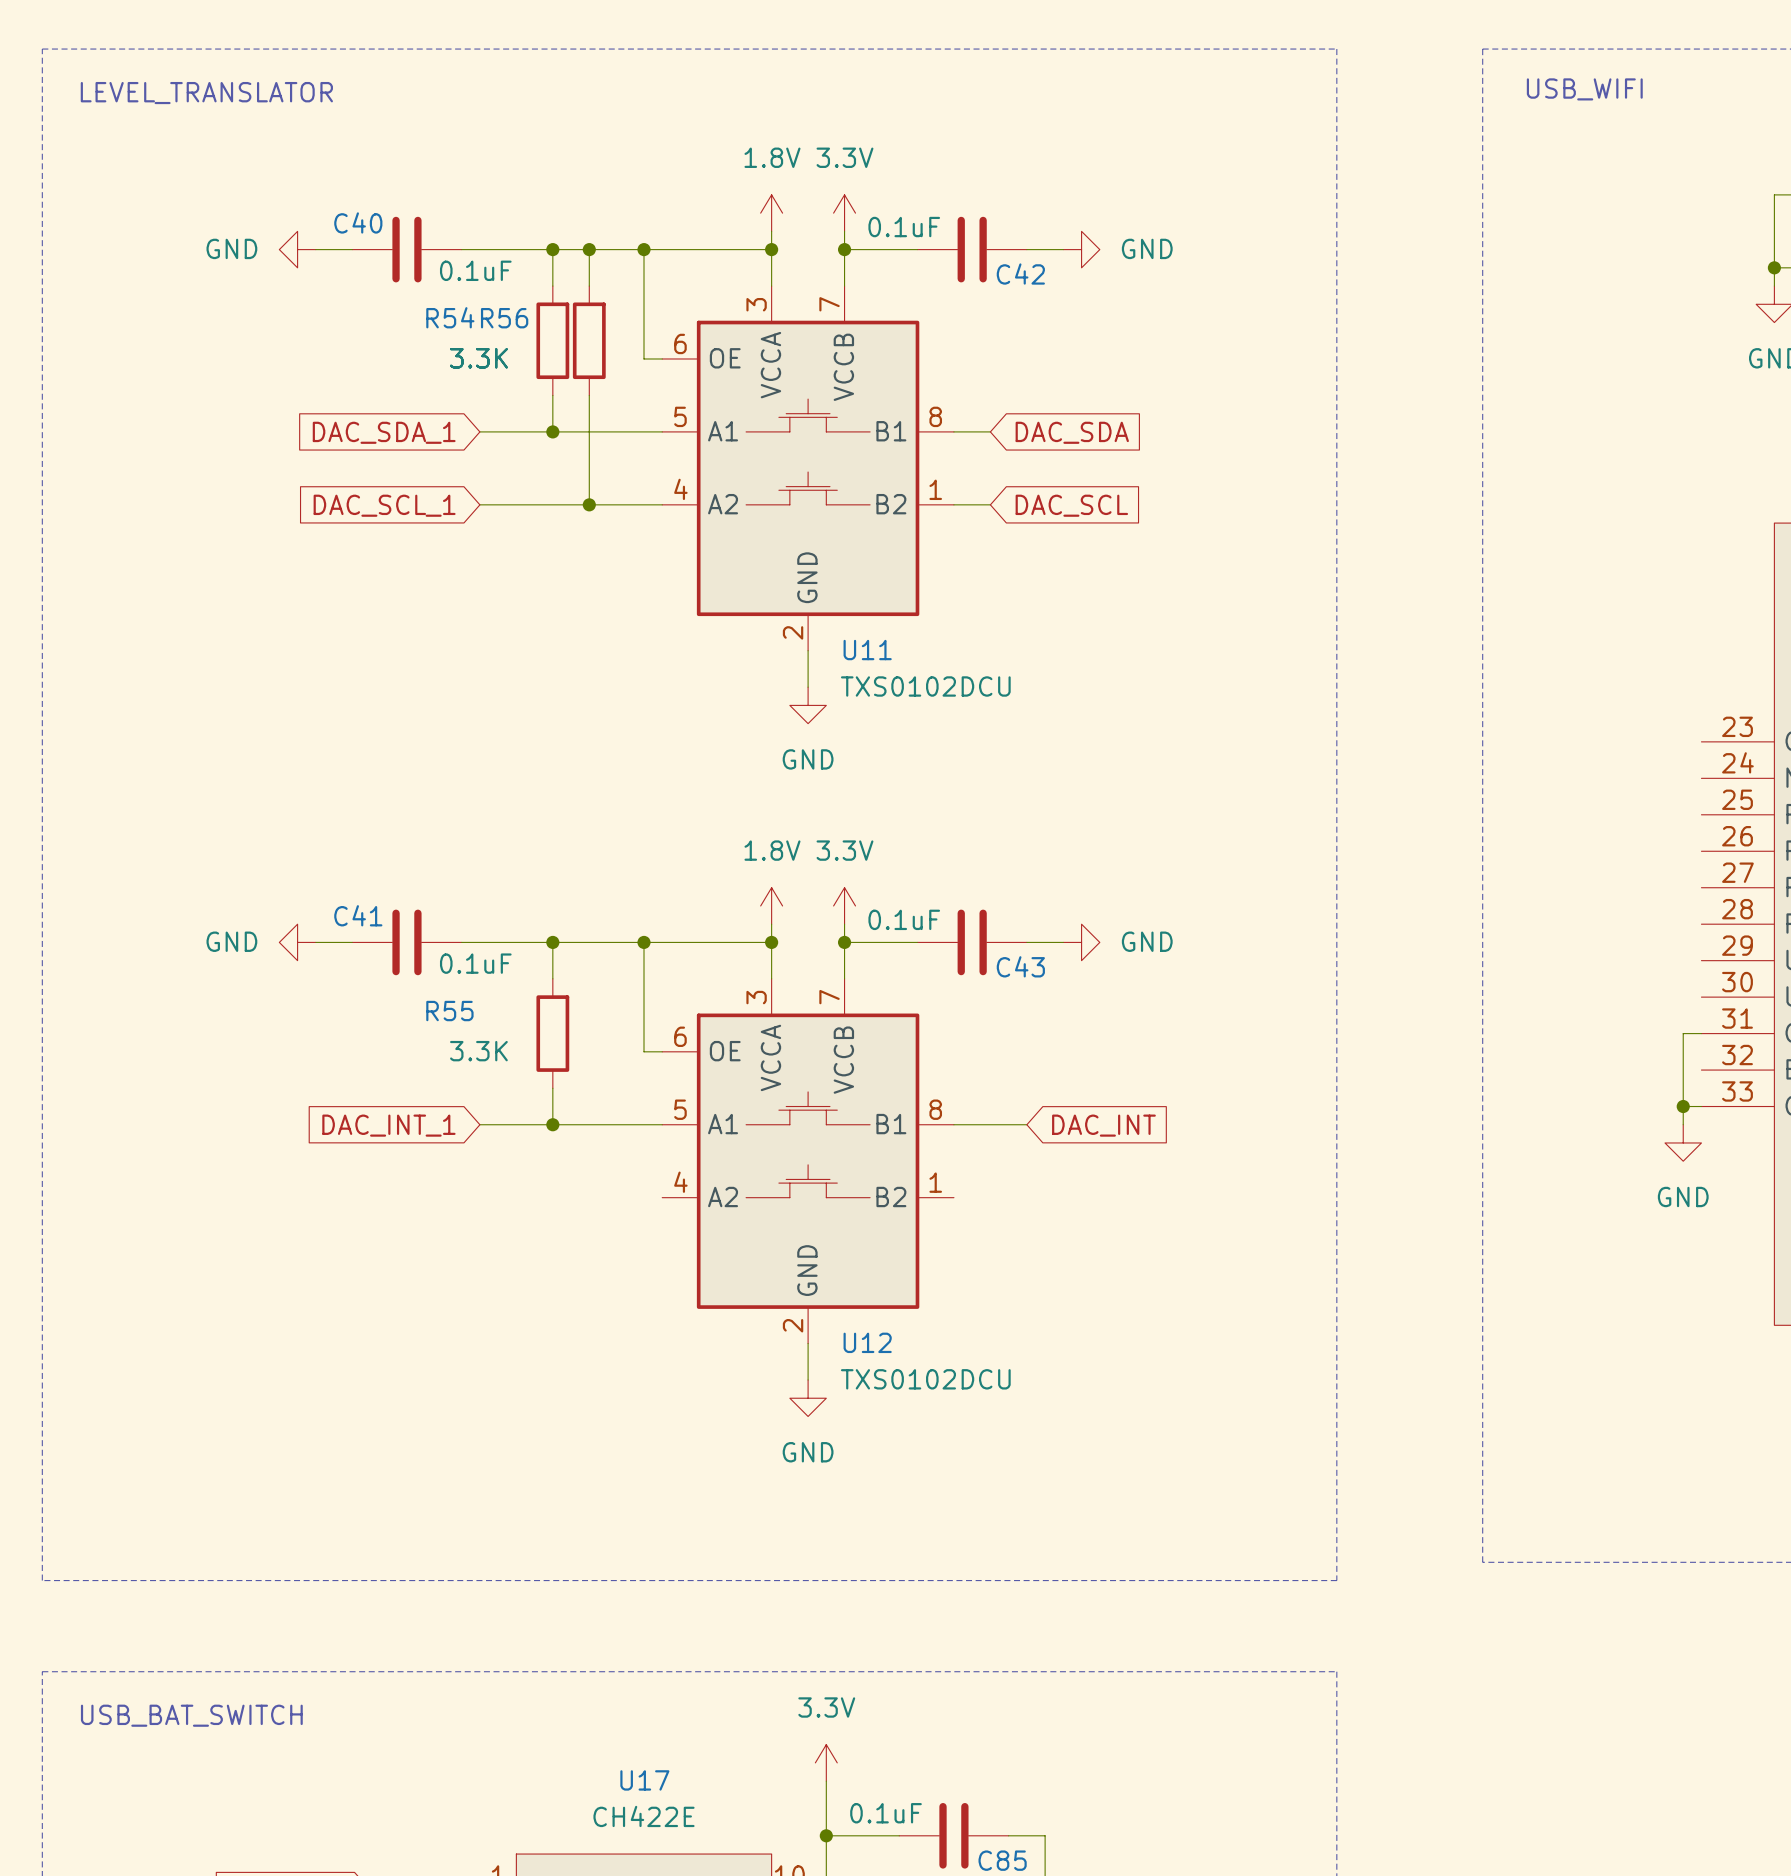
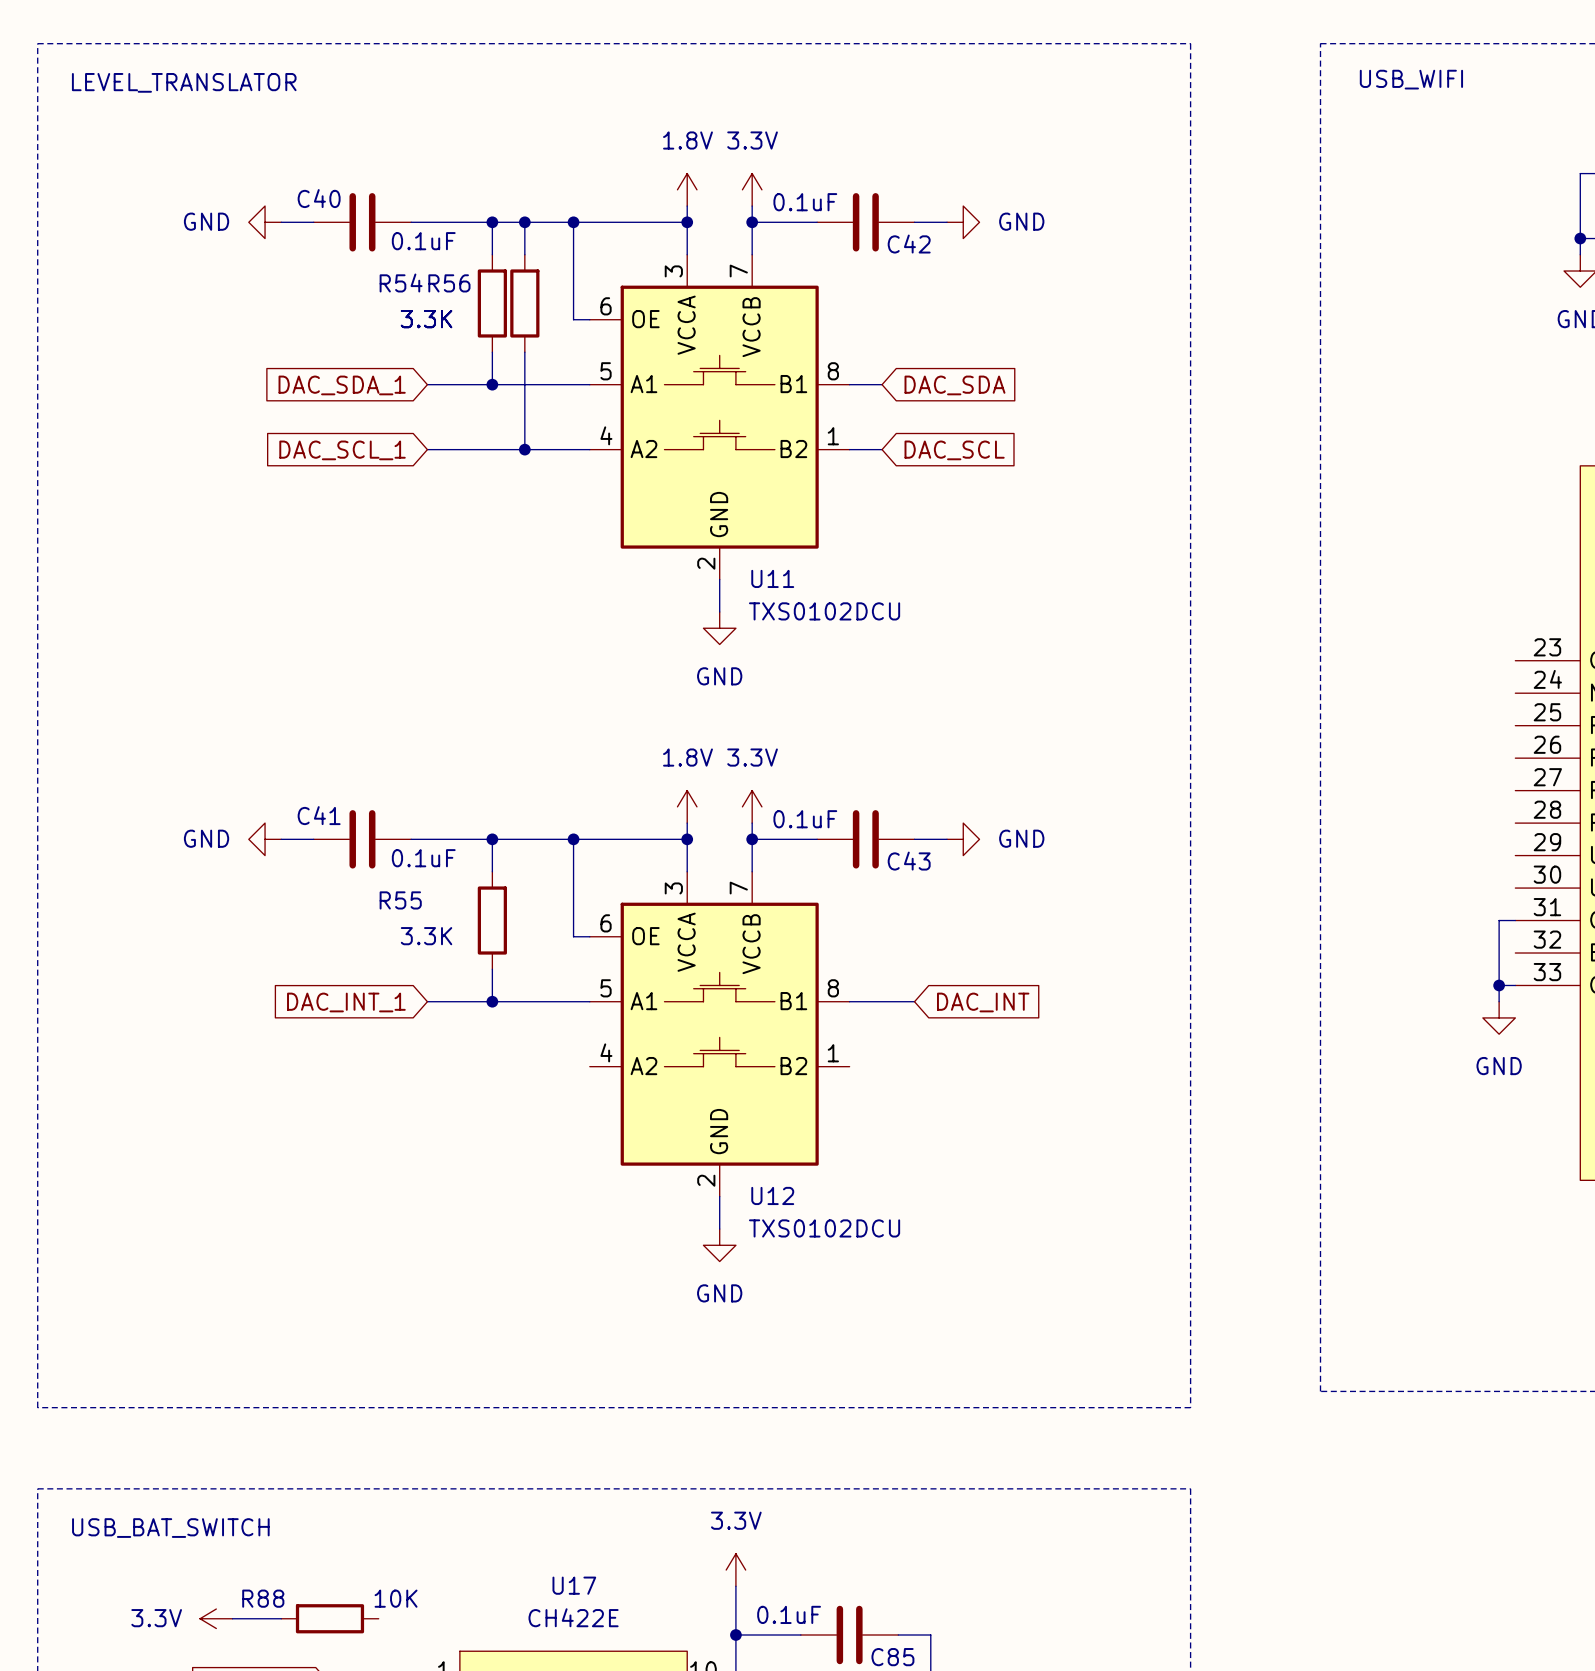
power symbol: none -> 3.3V (216, 1618)
wire: none -> (232, 1618) (281, 1618)
R88: none -> 10K (329, 1618)

